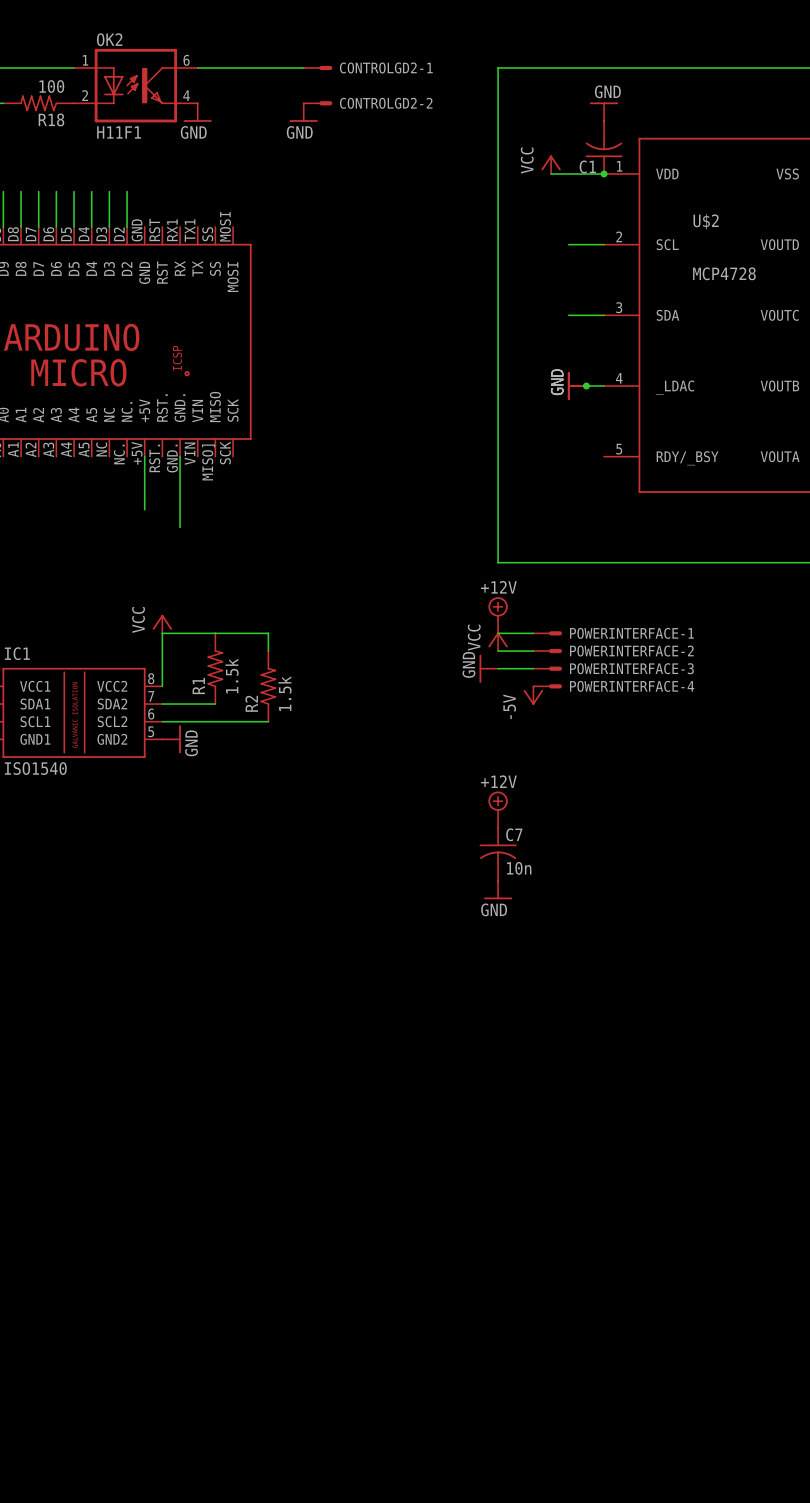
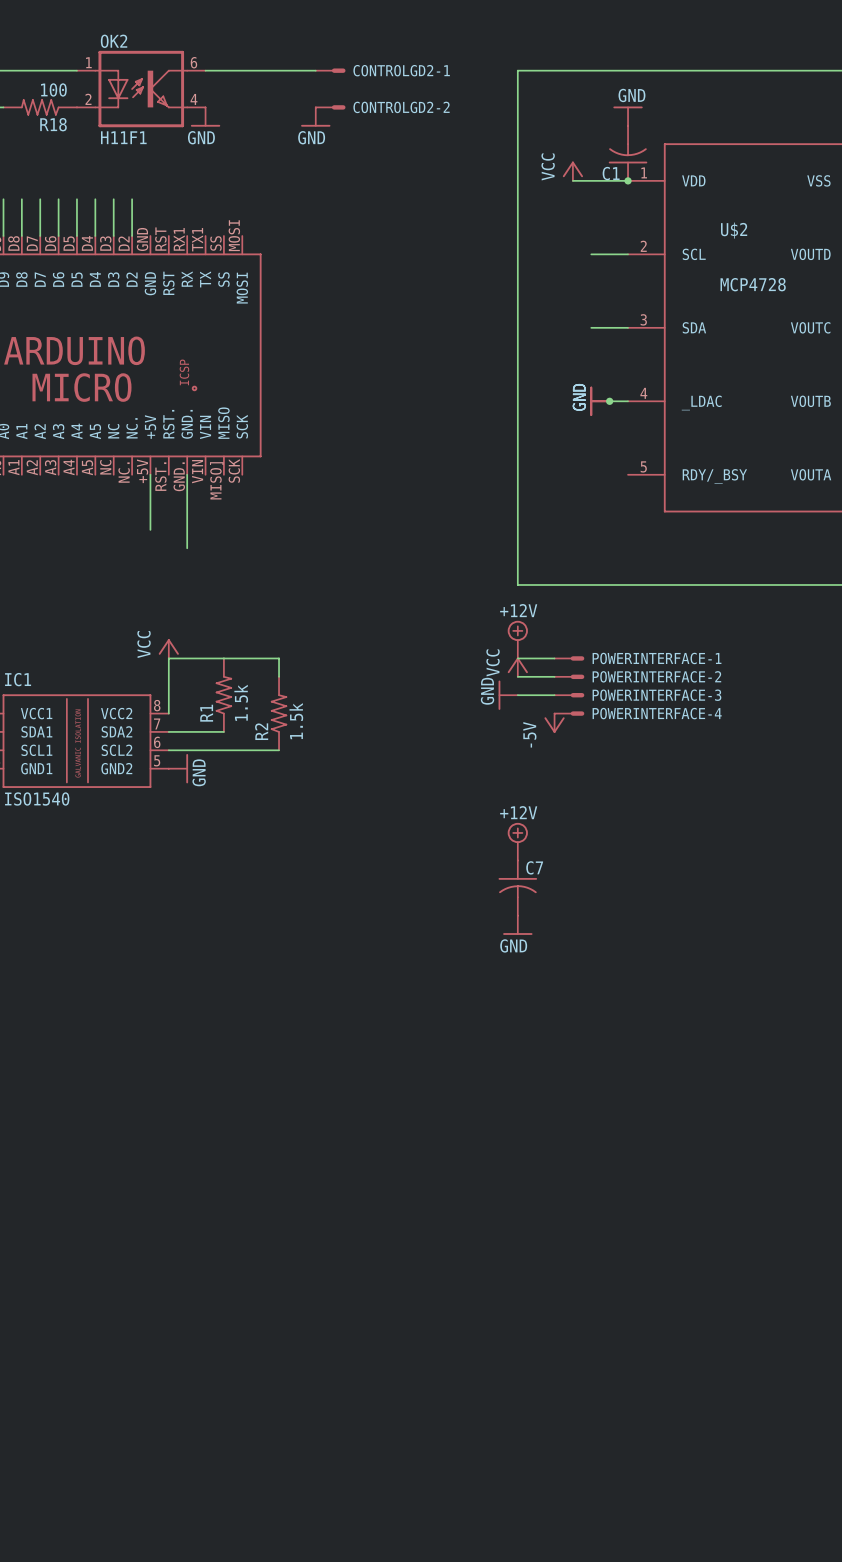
C7 value: 10n (519, 868) -> none

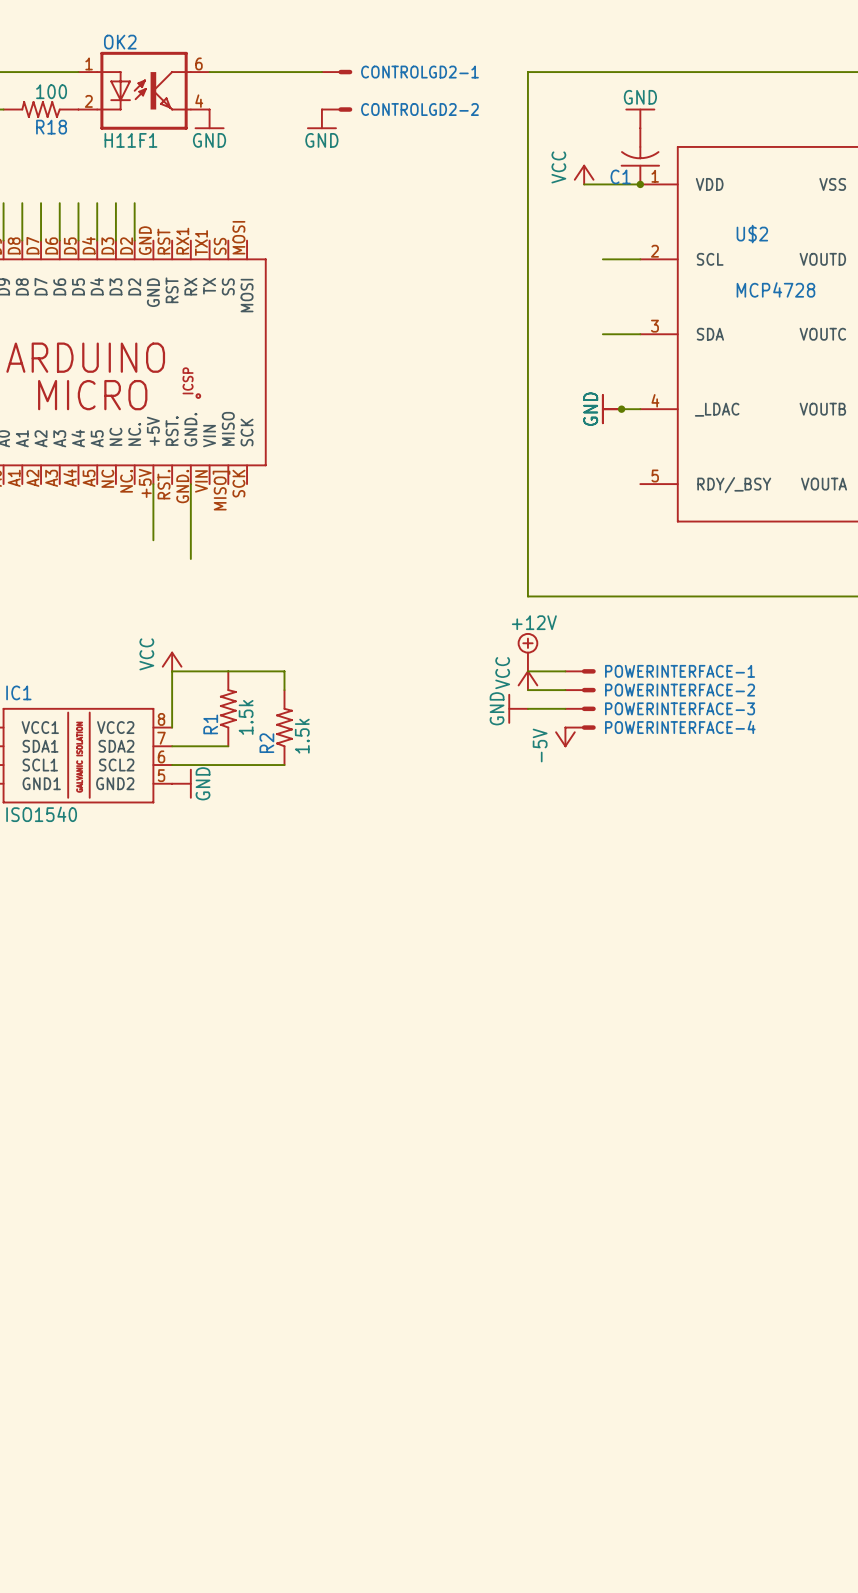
power symbol: +12V (517, 841) -> none
C7: (517, 888) -> none
power symbol: GND (517, 925) -> none

